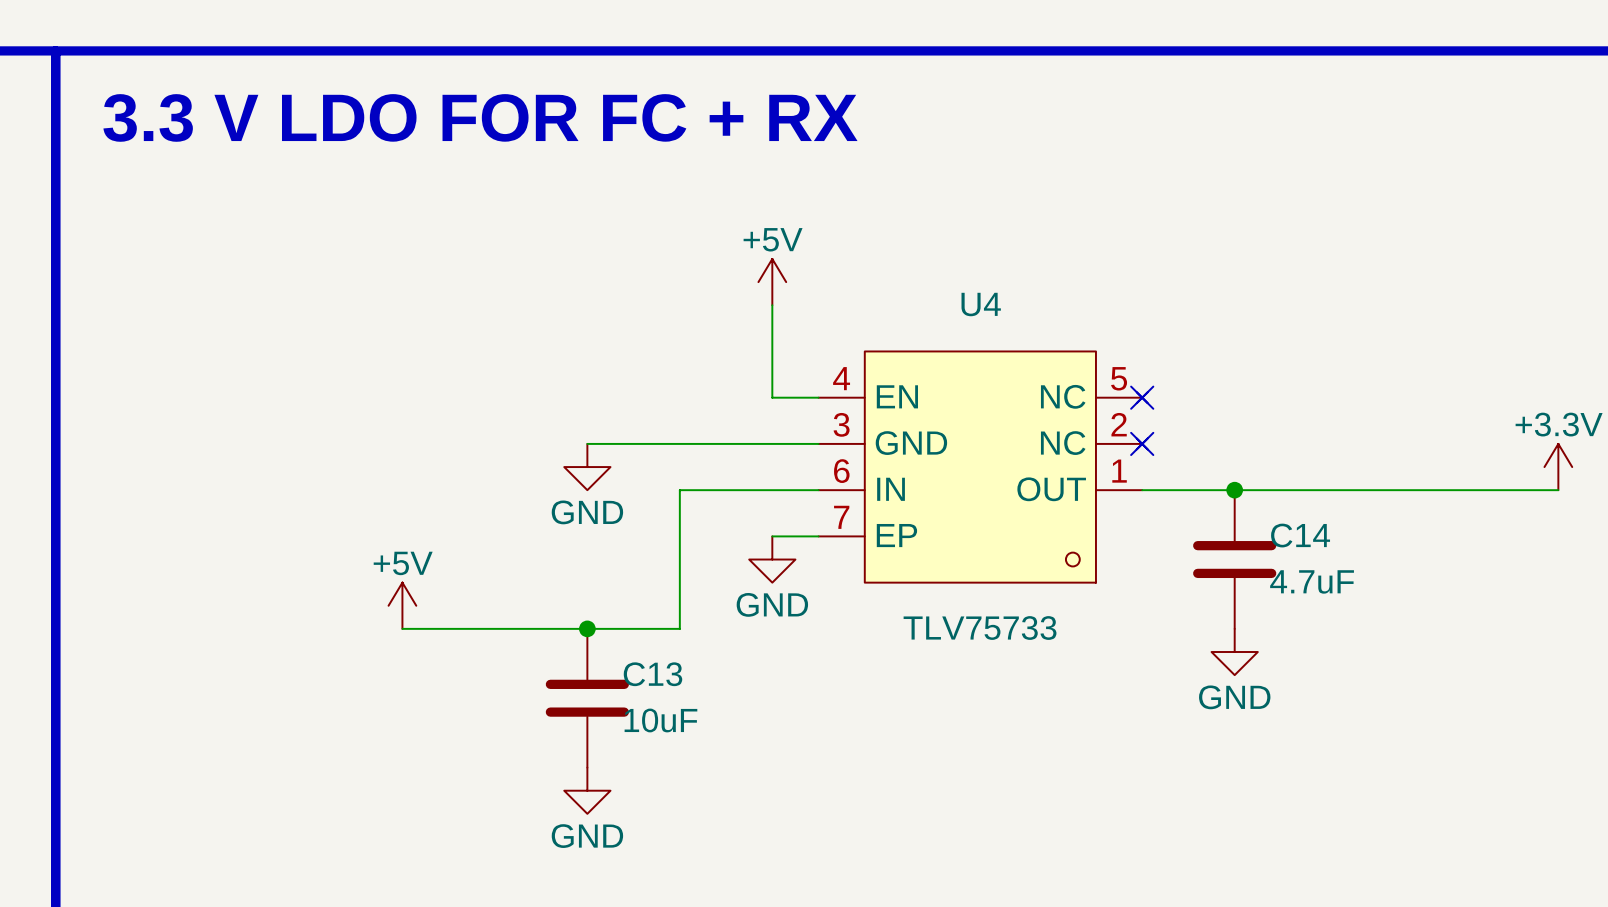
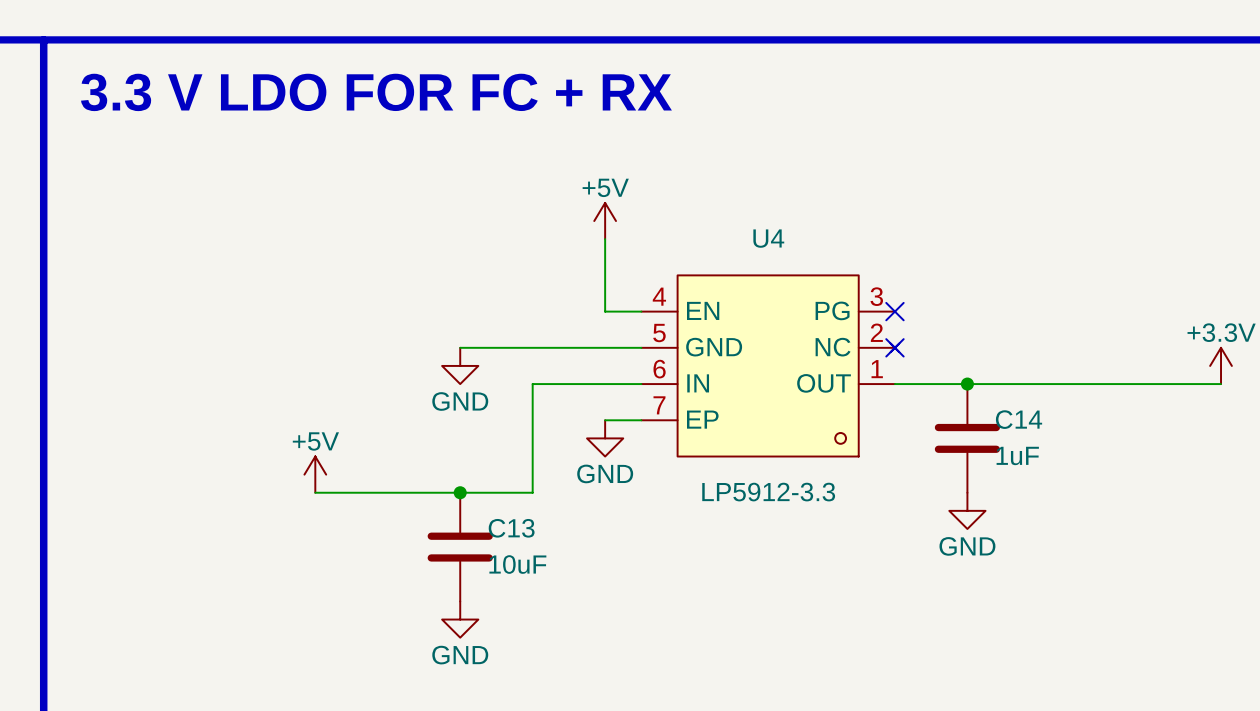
U4 symbol: [818, 351, 1148, 583] -> [641, 275, 900, 457]
C14 value: 4.7uF (1312, 581) -> 1uF (1017, 455)
U4 value: TLV75733 (980, 628) -> LP5912-3.3 (768, 492)

